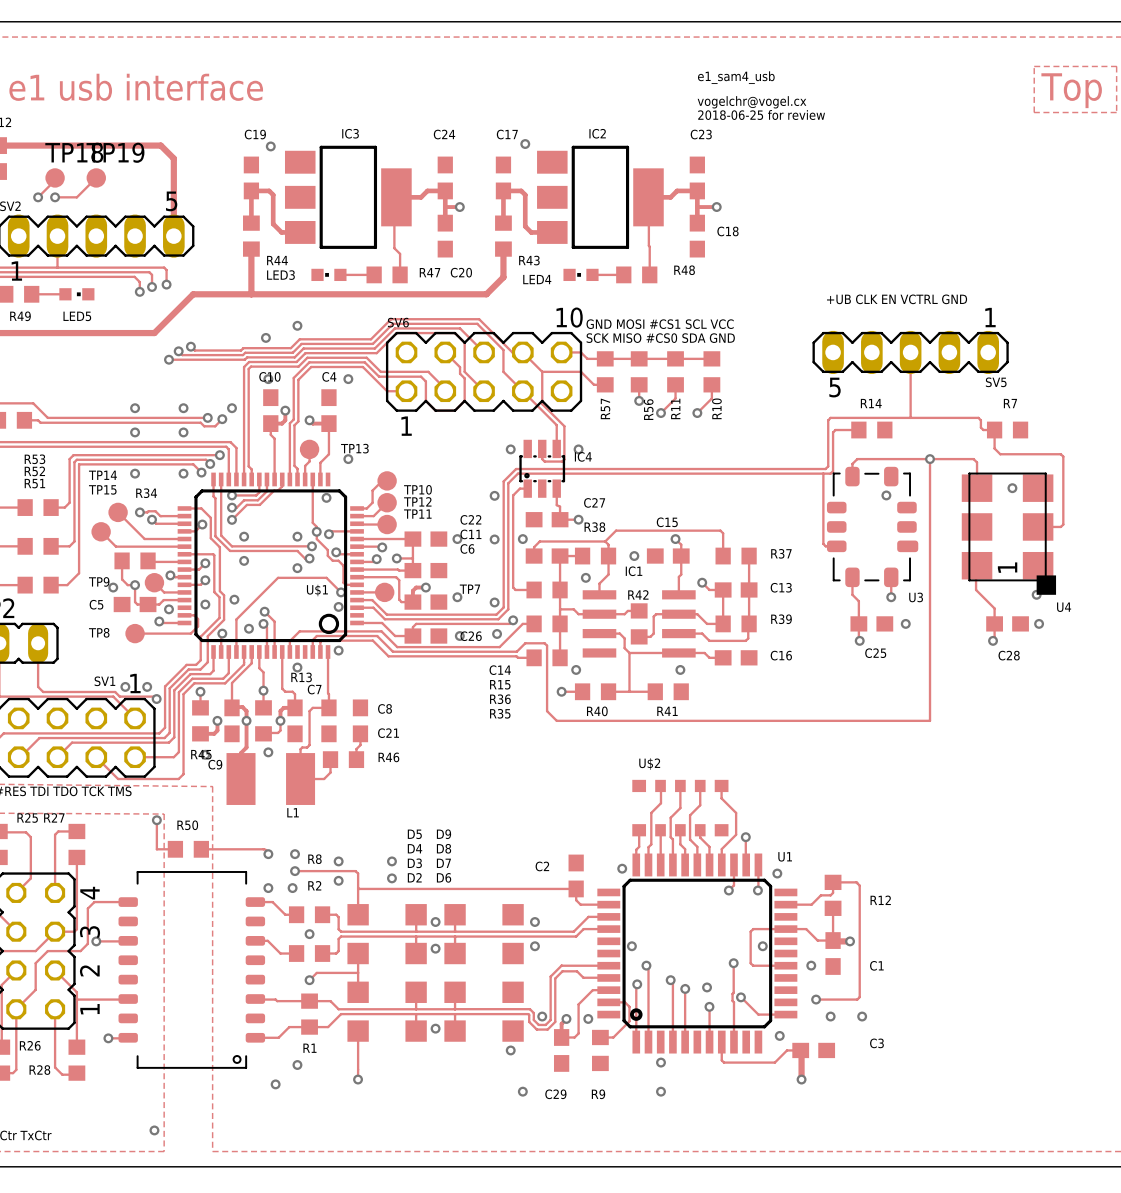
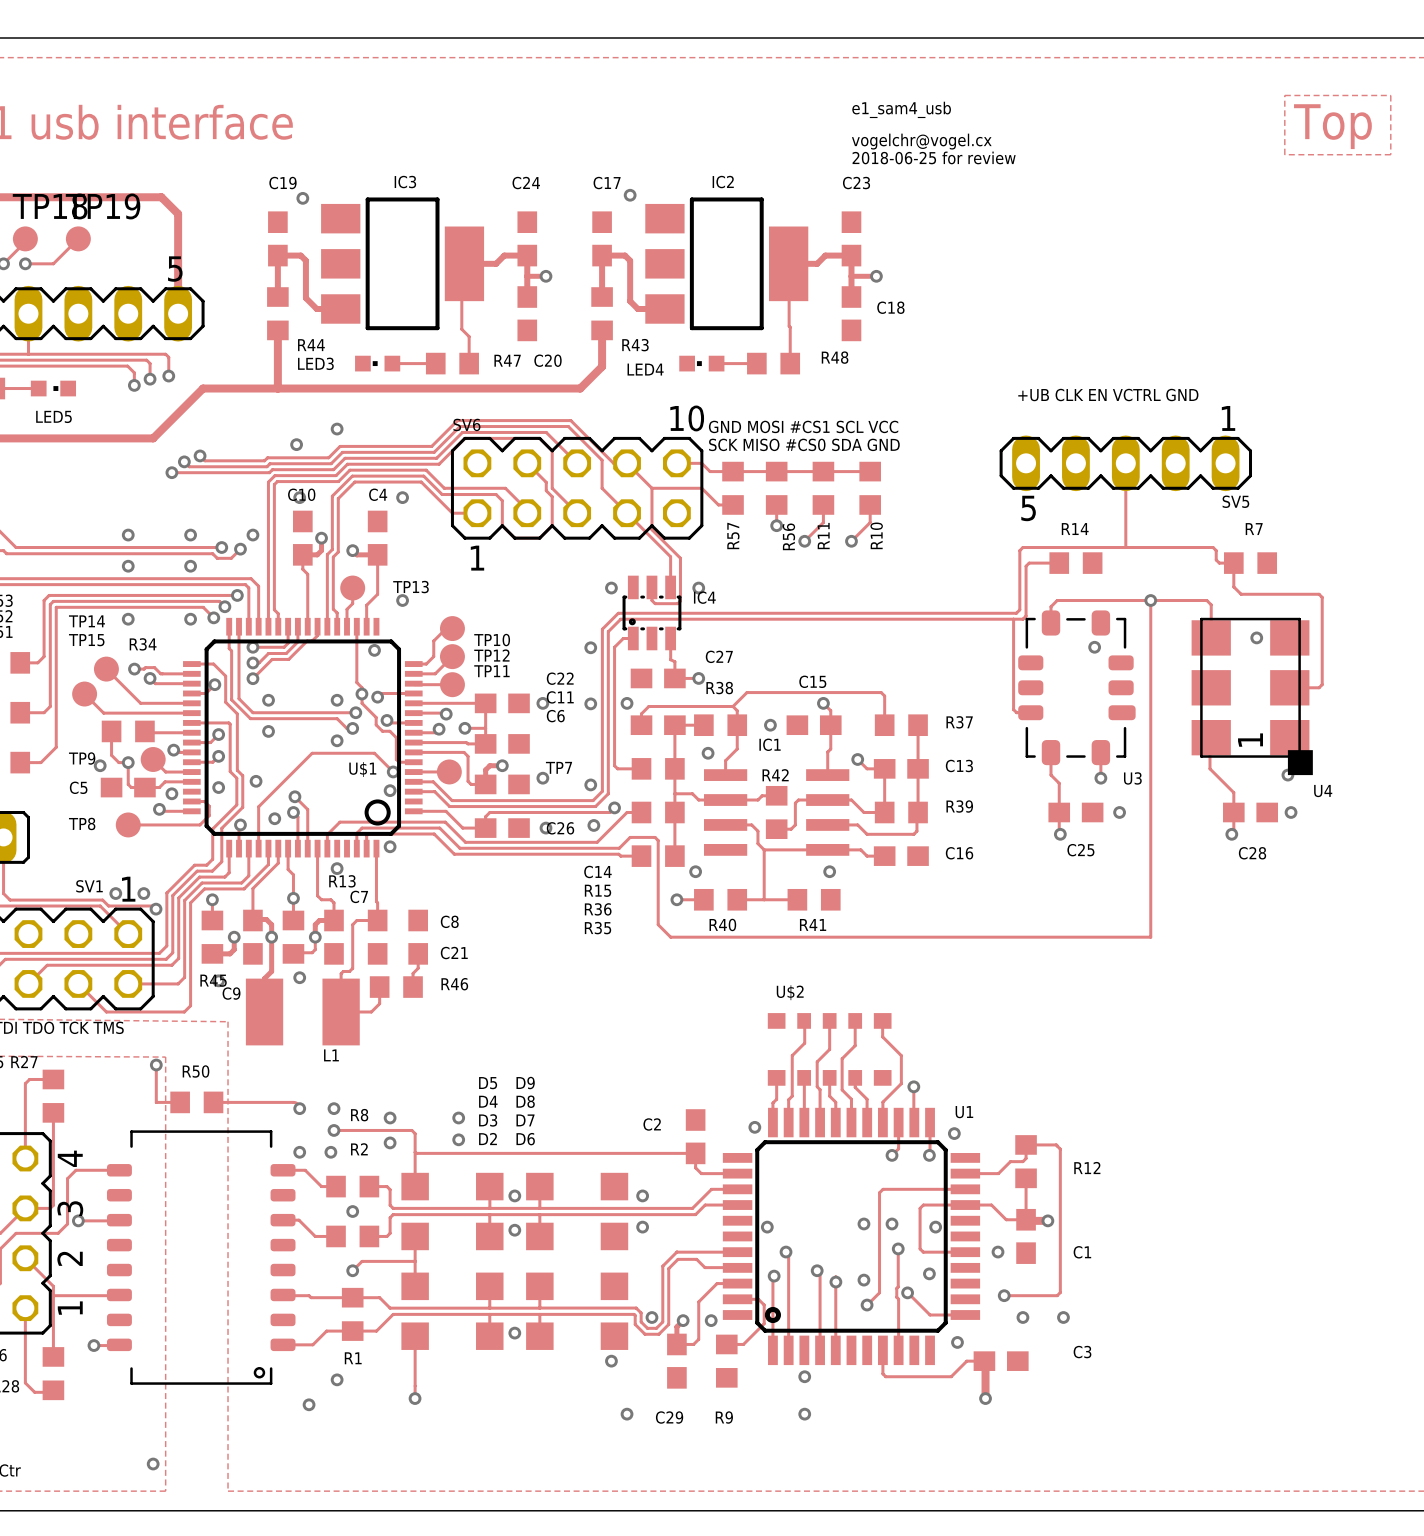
via: none -> (863, 1223)
via: none -> (892, 1223)
via: none -> (929, 1273)
track: (709, 1006) (709, 1042) -> (867, 1305) (879, 1292) (879, 1192) (883, 1189) (965, 1189)

